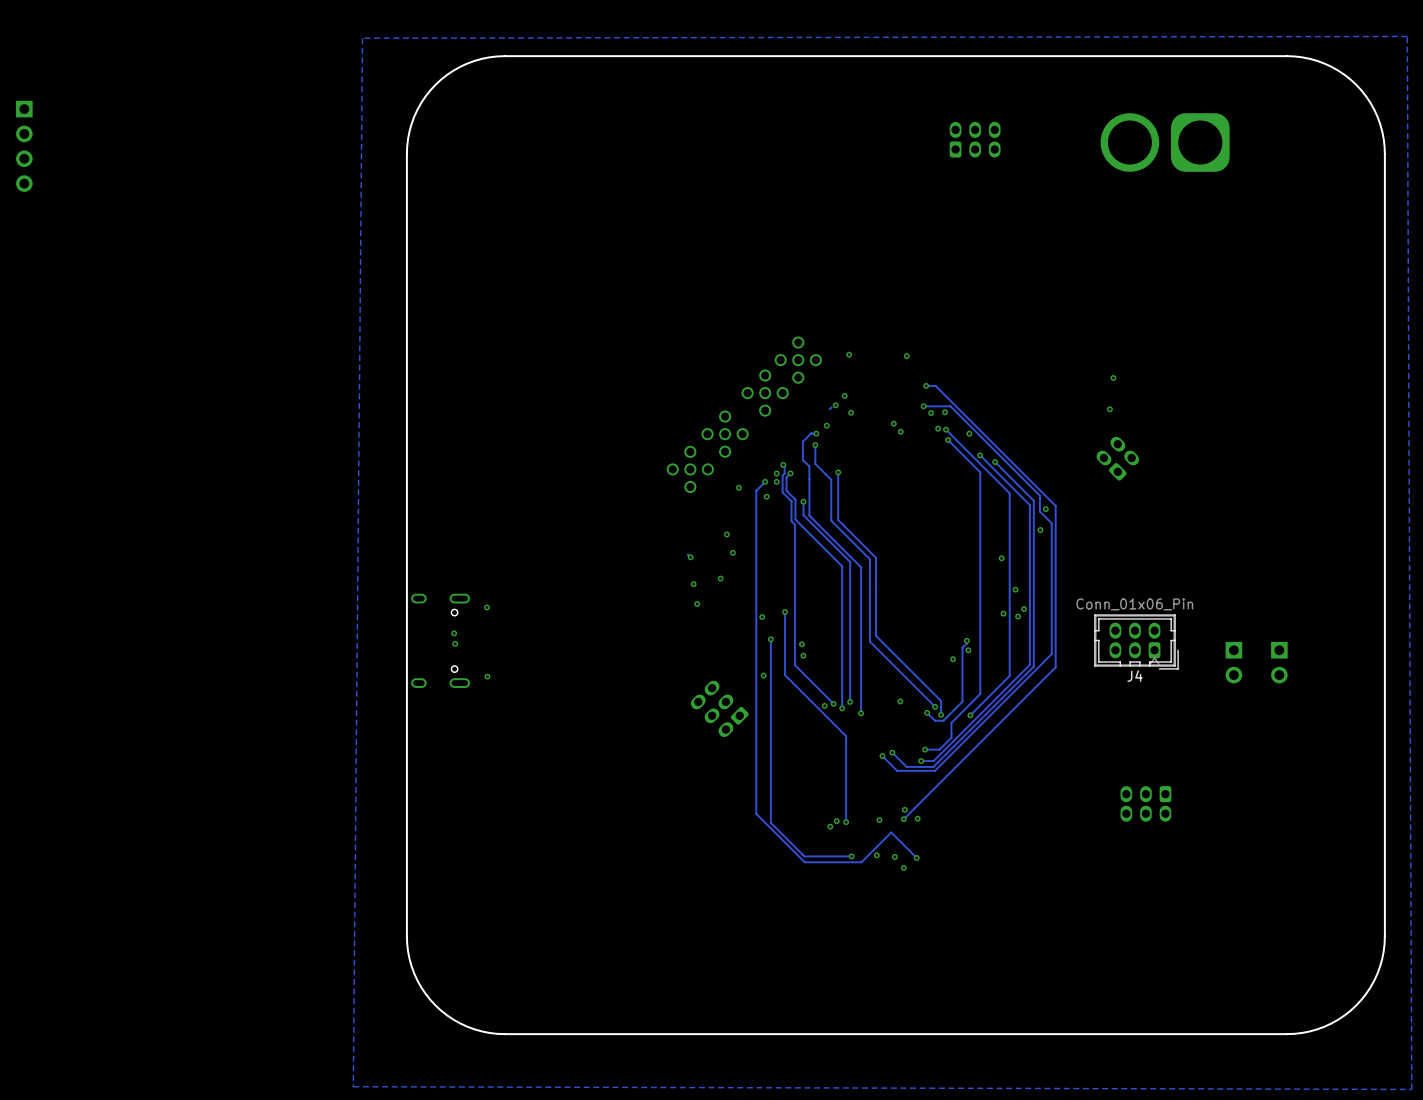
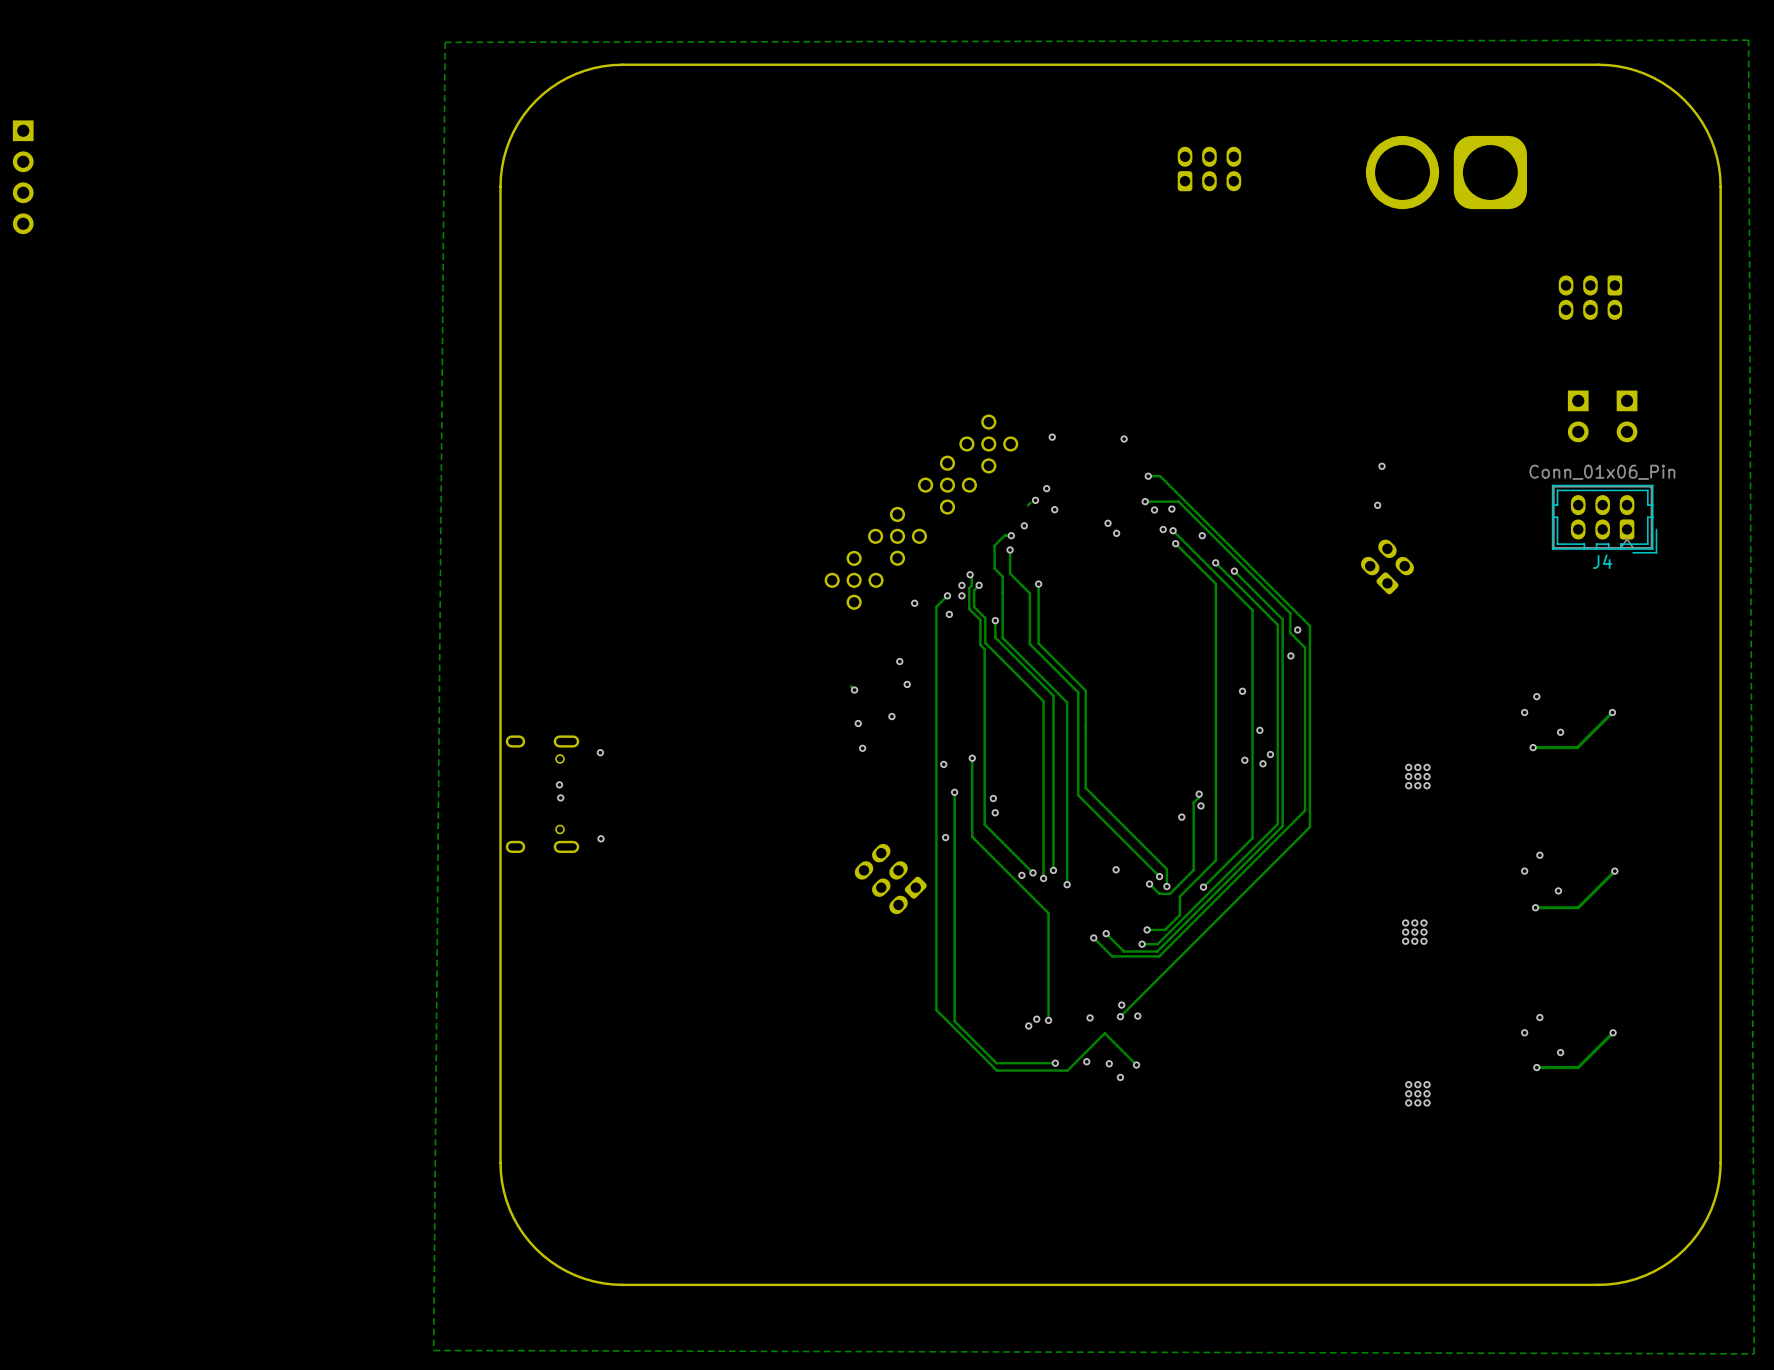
part: none -> (1590, 297)
part: none -> (1578, 416)
part: none -> (1627, 416)
via: none -> (1536, 696)
via: none -> (1524, 712)
track: none -> (1612, 712) (1577, 747) (1533, 747)
via: none -> (1612, 712)
via: none -> (1560, 732)
via: none -> (1533, 747)
via: none -> (1408, 767)
via: none -> (1417, 767)
via: none -> (1427, 767)
via: none -> (1408, 776)
via: none -> (1417, 776)
via: none -> (1427, 776)
via: none -> (1408, 785)
via: none -> (1417, 785)
via: none -> (1427, 785)
J4 position: (1136, 641) -> (1604, 519)
part: (1233, 662) -> none
part: (1279, 662) -> none
via: none -> (1539, 855)
via: none -> (1524, 871)
track: none -> (1614, 871) (1578, 907) (1535, 907)
via: none -> (1614, 871)
via: none -> (1558, 890)
via: none -> (1535, 907)
via: none -> (1405, 922)
via: none -> (1414, 922)
via: none -> (1423, 922)
via: none -> (1405, 932)
via: none -> (1414, 932)
via: none -> (1423, 932)
via: none -> (1405, 941)
via: none -> (1414, 941)
via: none -> (1423, 941)
part: (1145, 803) -> none
via: none -> (1539, 1017)
via: none -> (1524, 1032)
track: none -> (1613, 1032) (1578, 1067) (1536, 1067)
via: none -> (1613, 1032)
via: none -> (1560, 1052)
via: none -> (1536, 1067)
via: none -> (1408, 1084)
via: none -> (1417, 1084)
via: none -> (1427, 1084)
via: none -> (1408, 1093)
via: none -> (1417, 1093)
via: none -> (1427, 1093)
via: none -> (1408, 1102)
via: none -> (1417, 1102)
via: none -> (1427, 1102)

